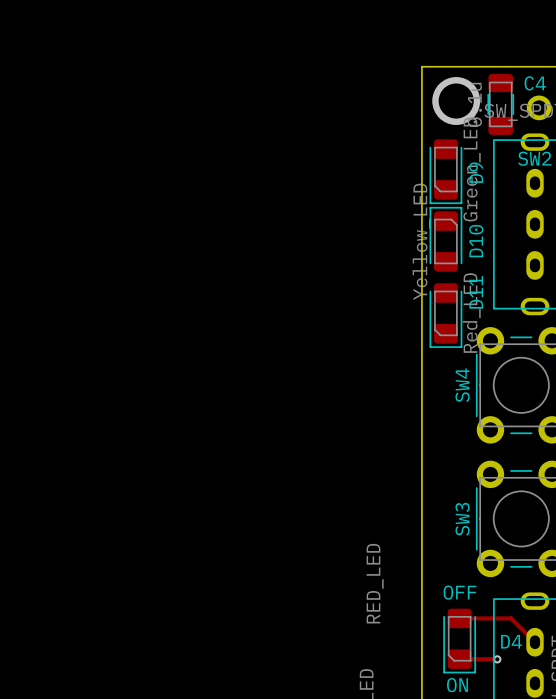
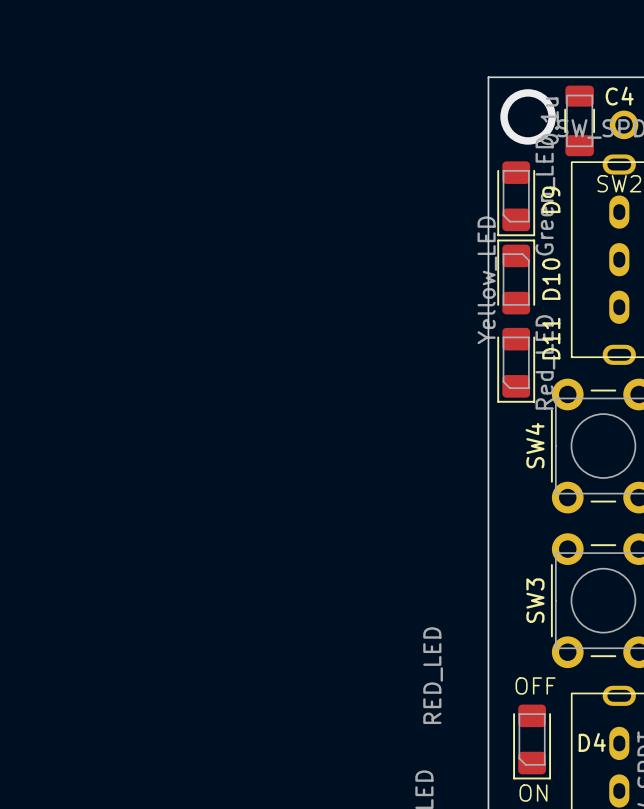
track: (459, 618) (511, 618) (534, 642) -> none
track: (459, 659) (497, 659) -> none
via: (497, 659) -> none

